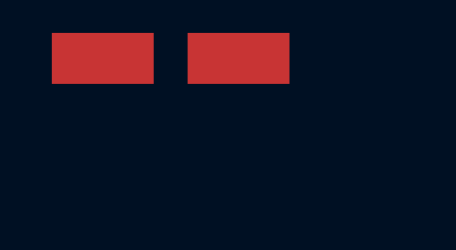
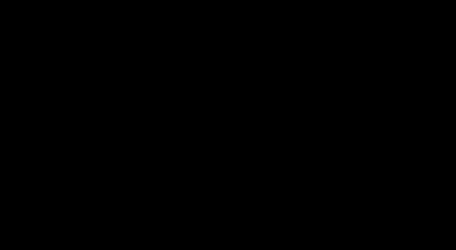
part: (170, 58) -> none

